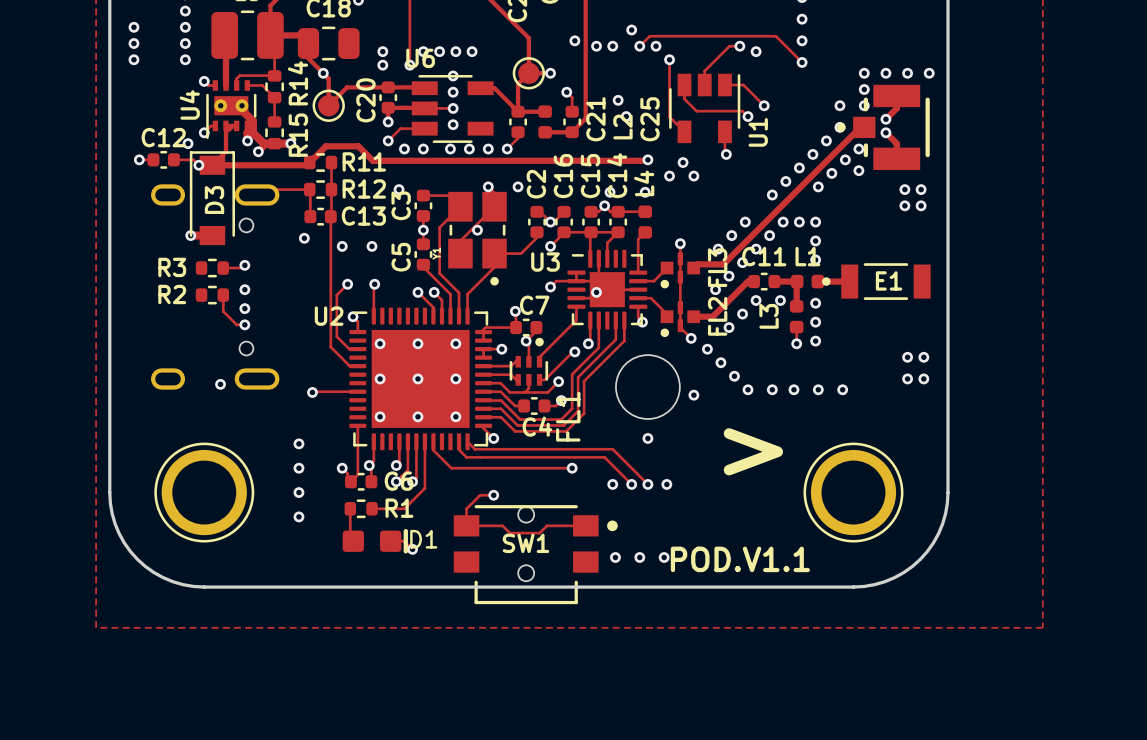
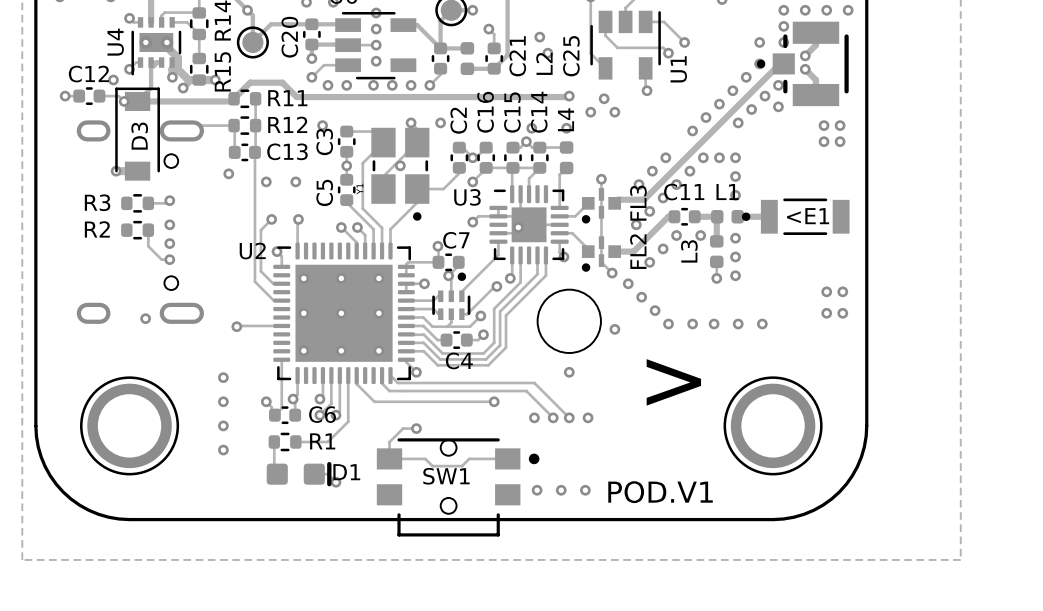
E1 name: E1 (889, 280) -> <E1 (808, 216)
FL1 name: FL1 (568, 416) -> none
text: POD.V1.1 (740, 559) -> POD.V1 (660, 492)

